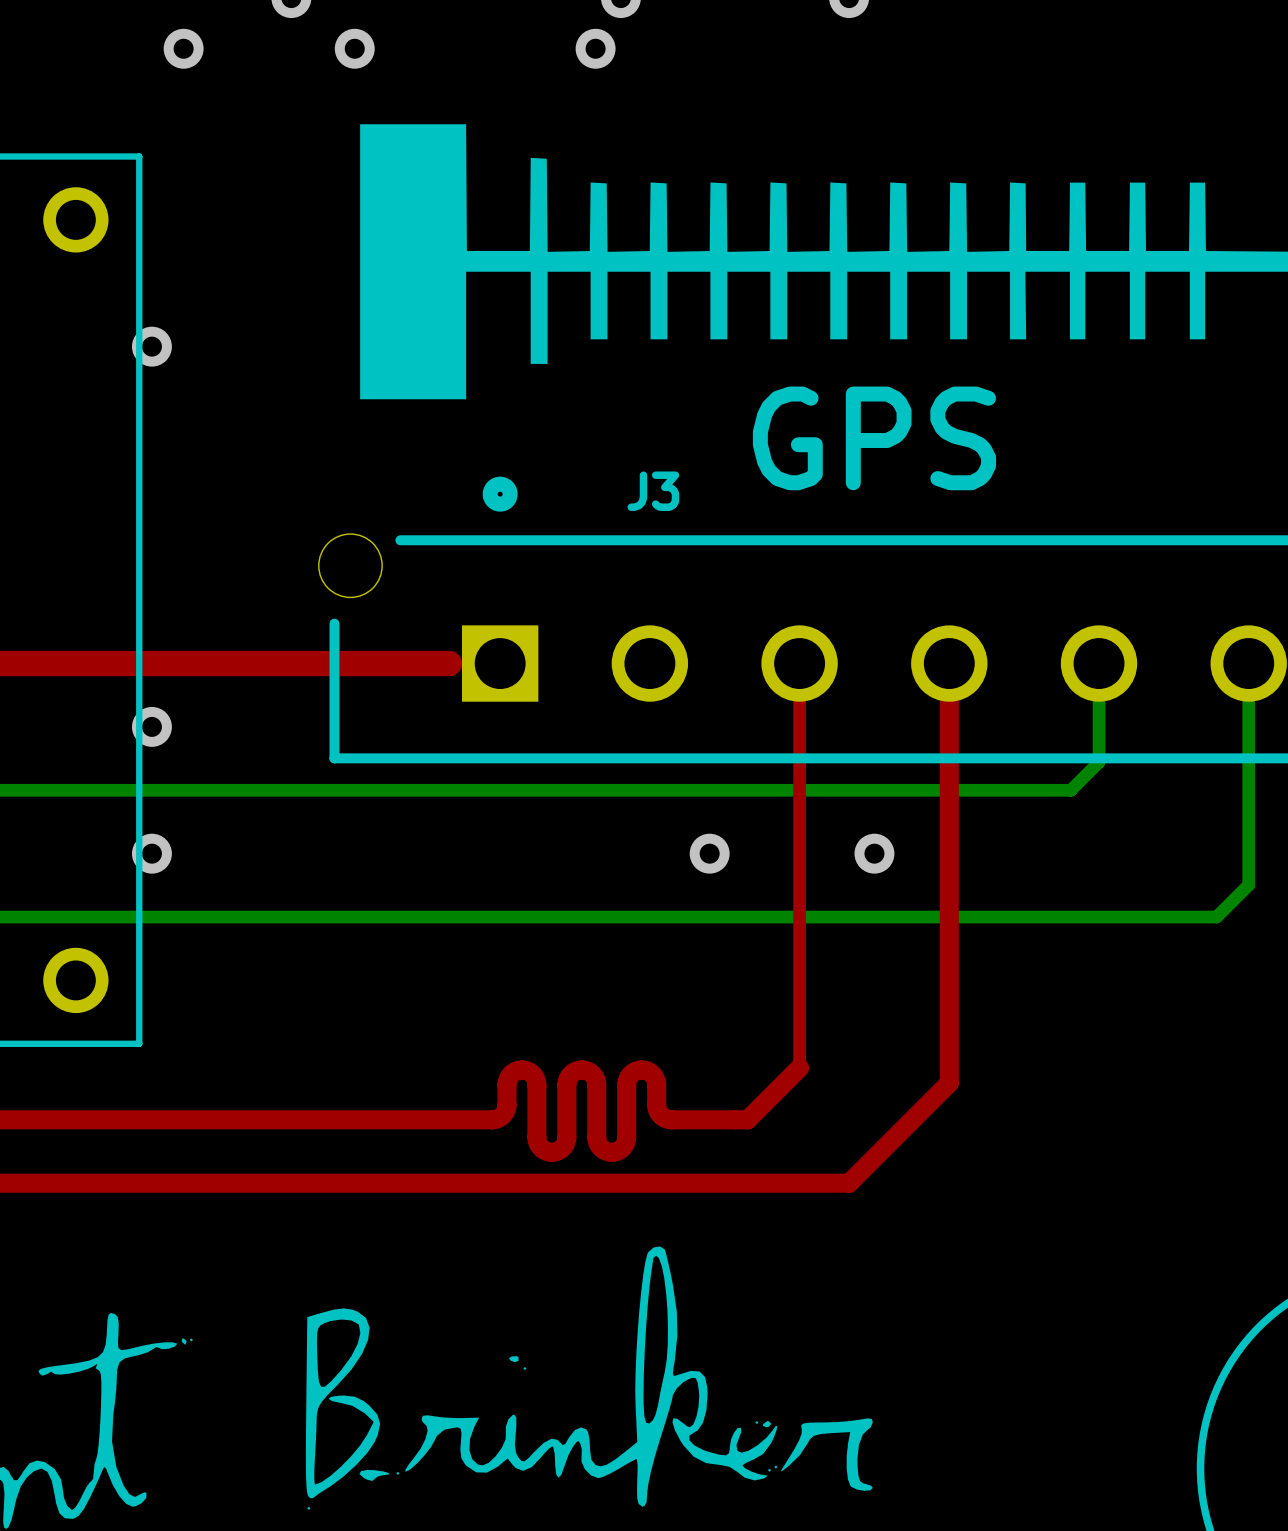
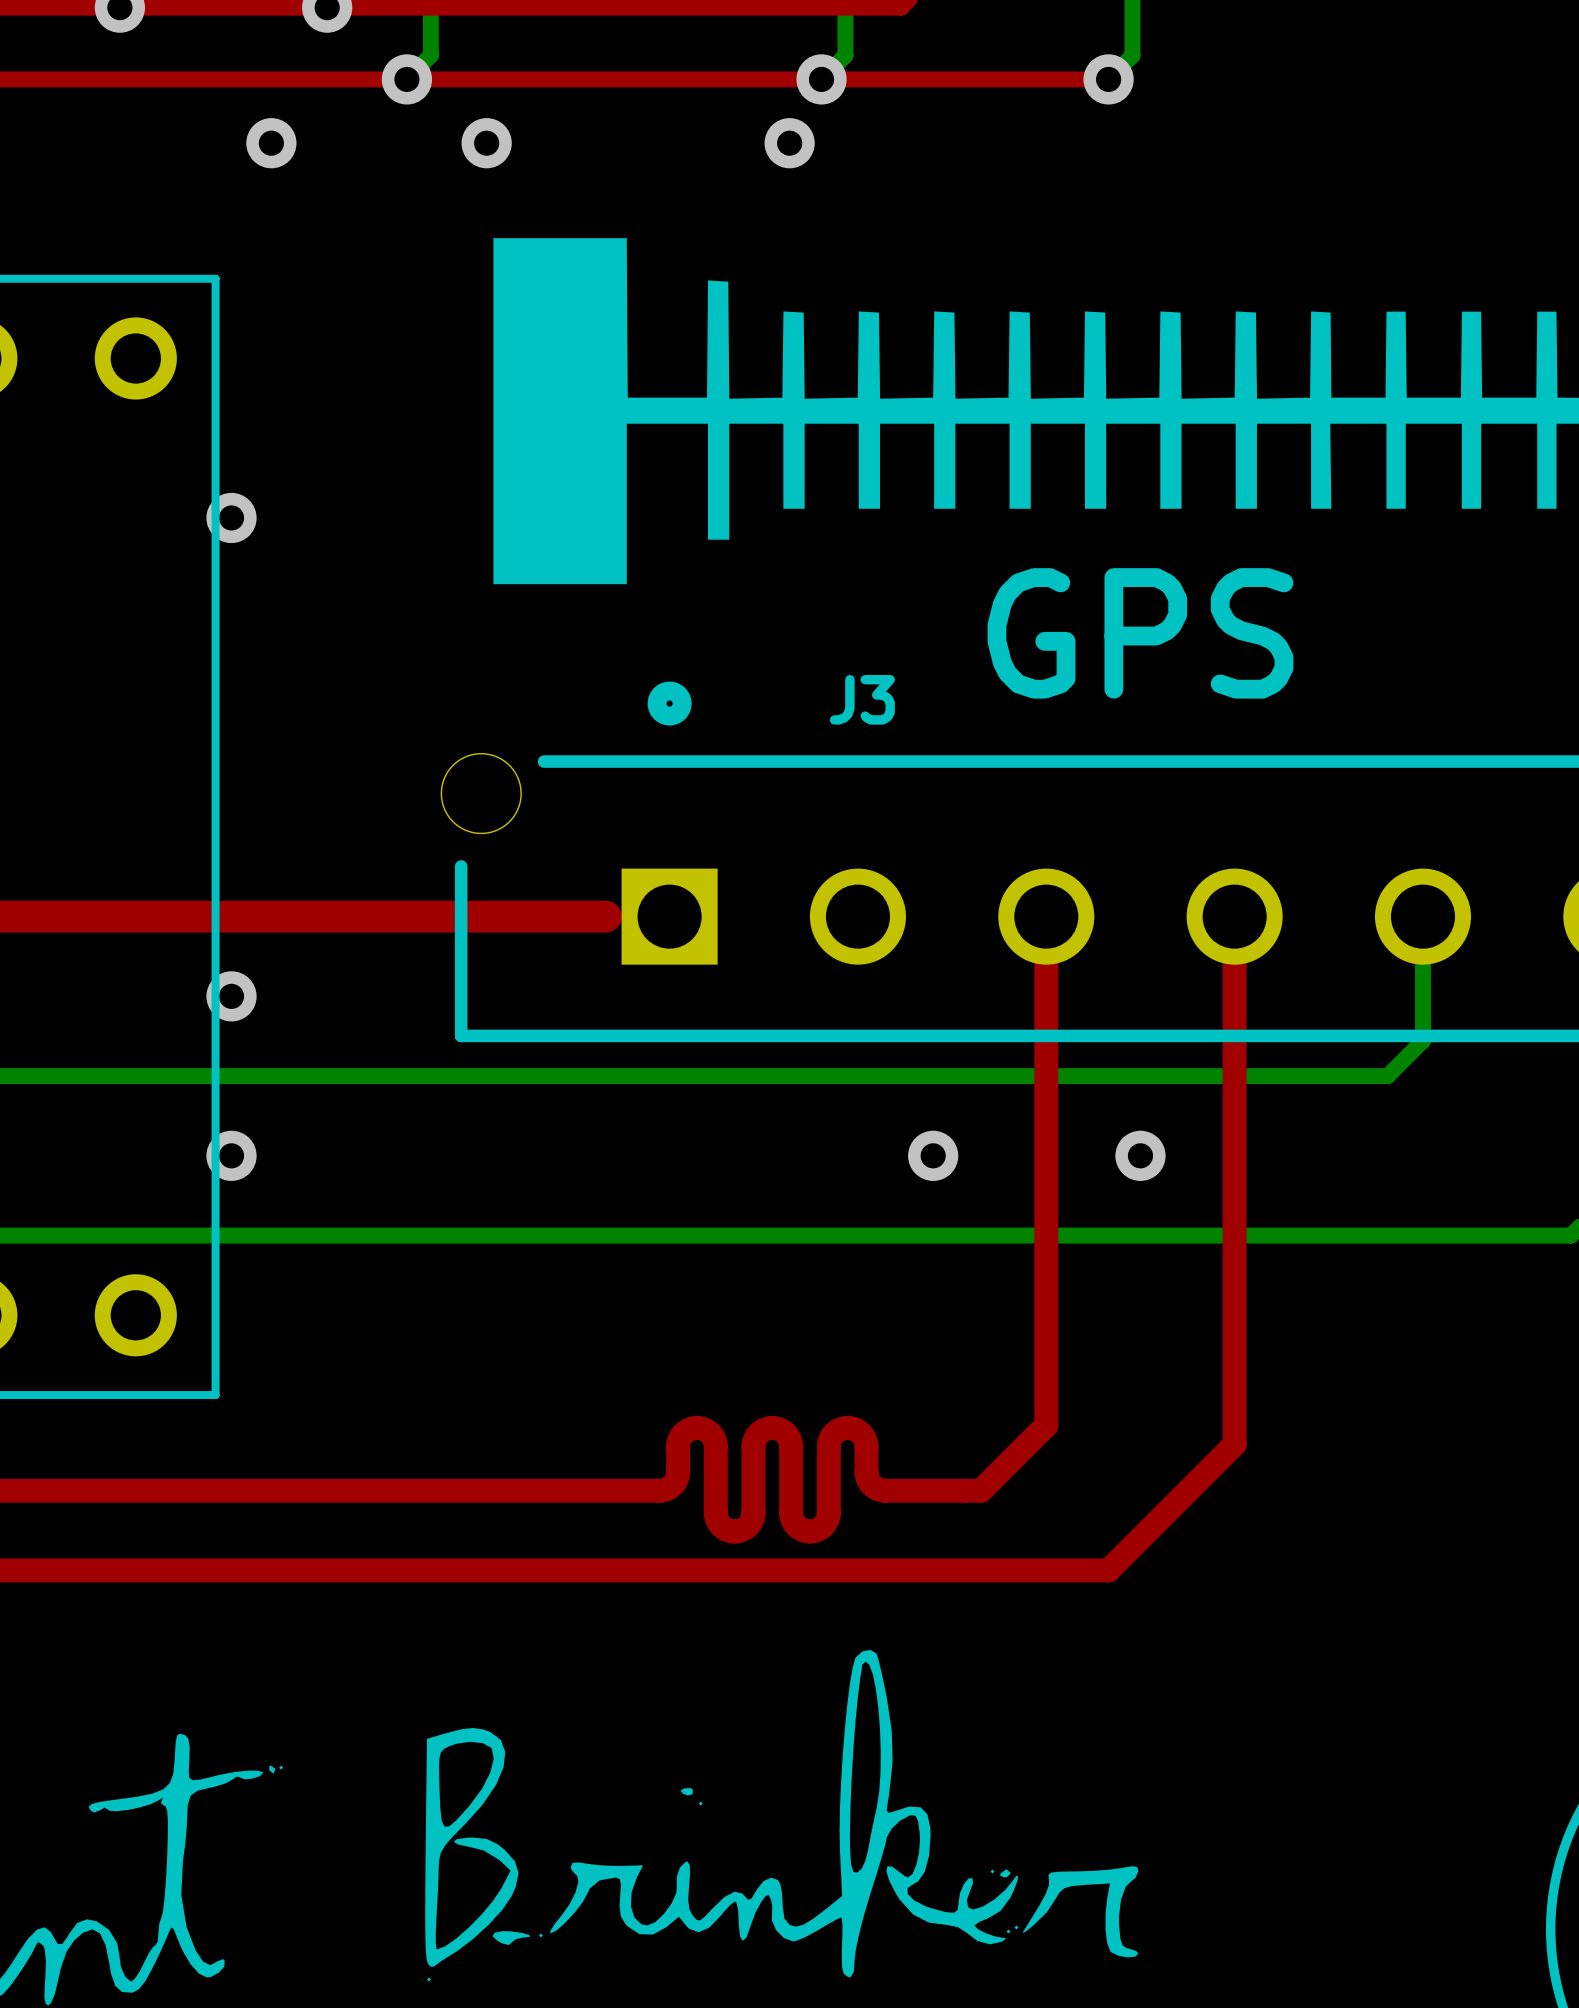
top track width: thin (799, 663) (799, 1067) -> thick (1046, 916) (1046, 1425)

